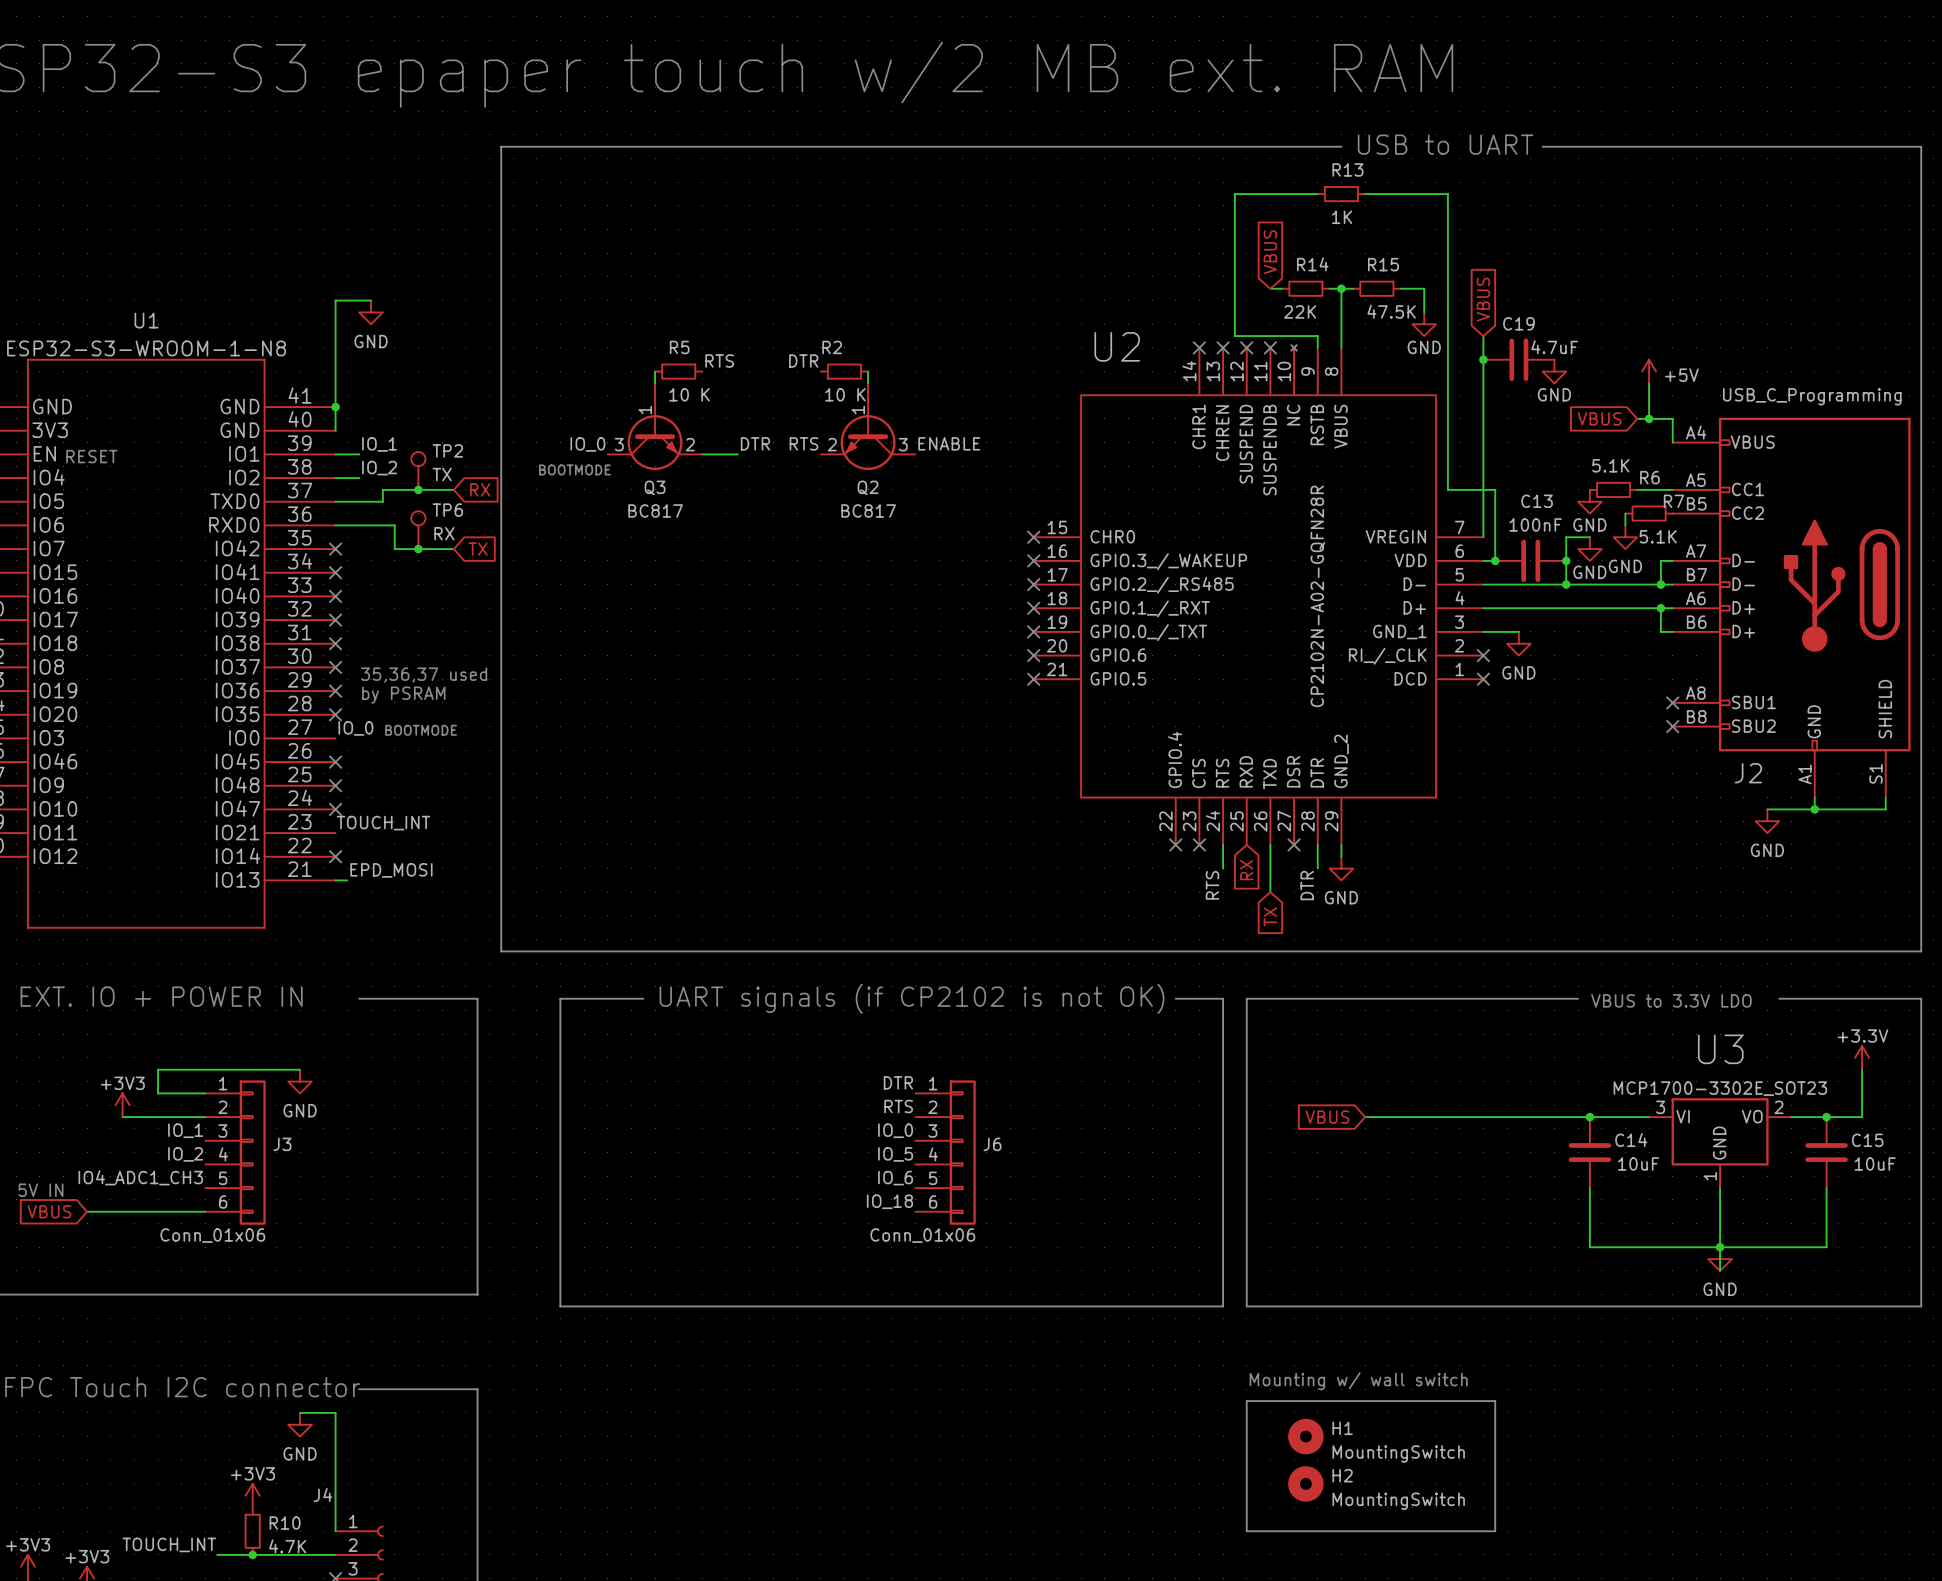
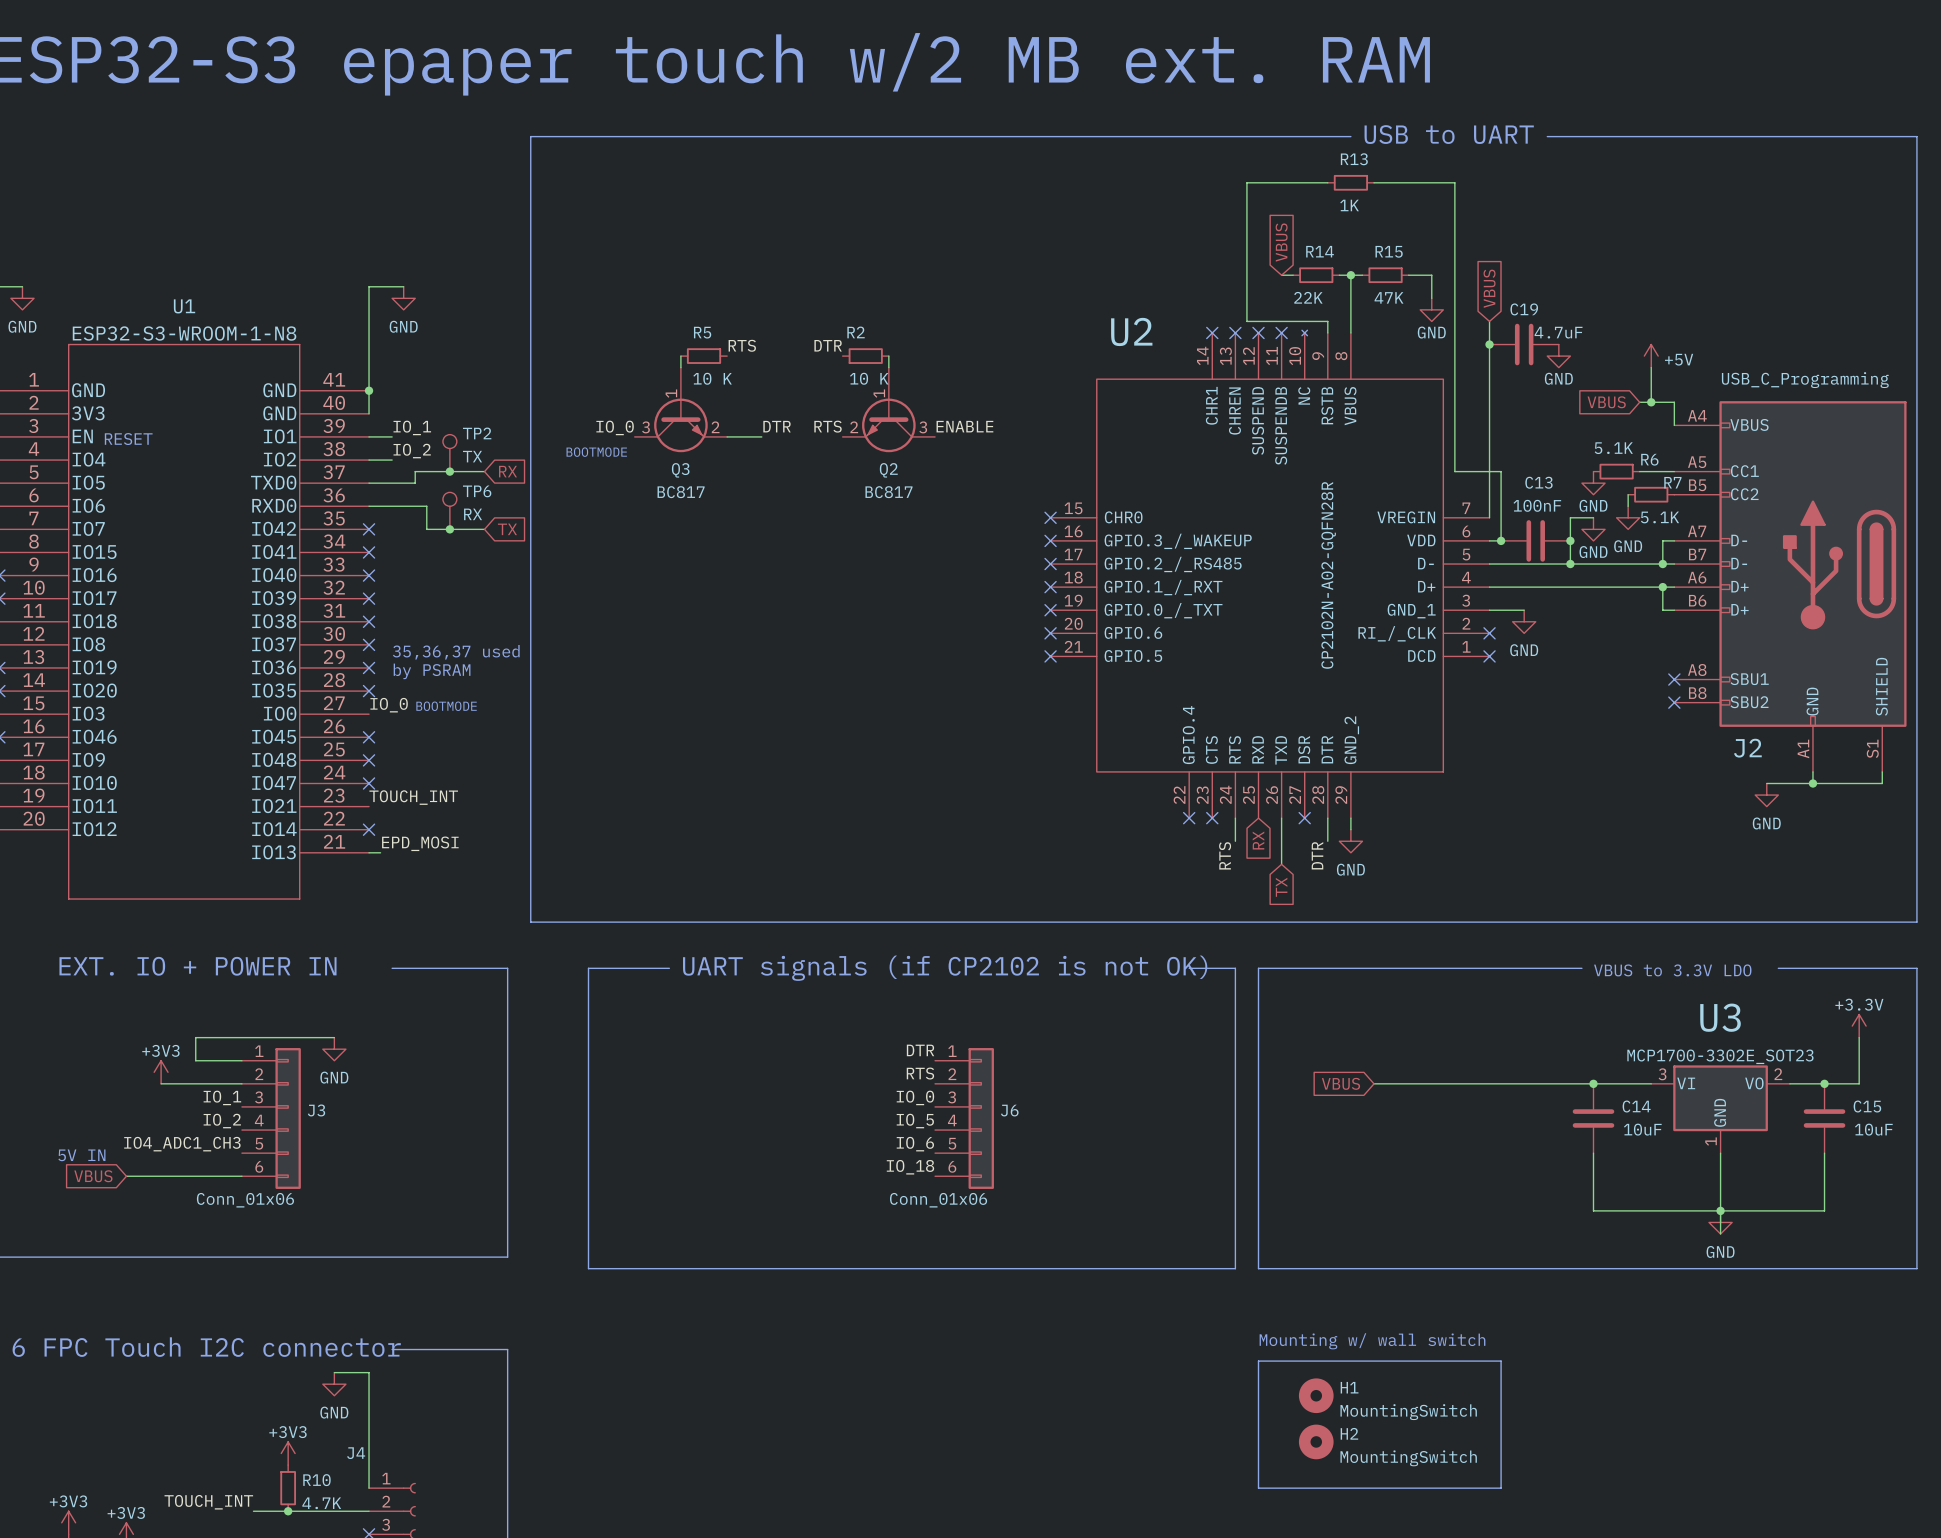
R15 value: 47.5K (1391, 311) -> 47K (1389, 297)

